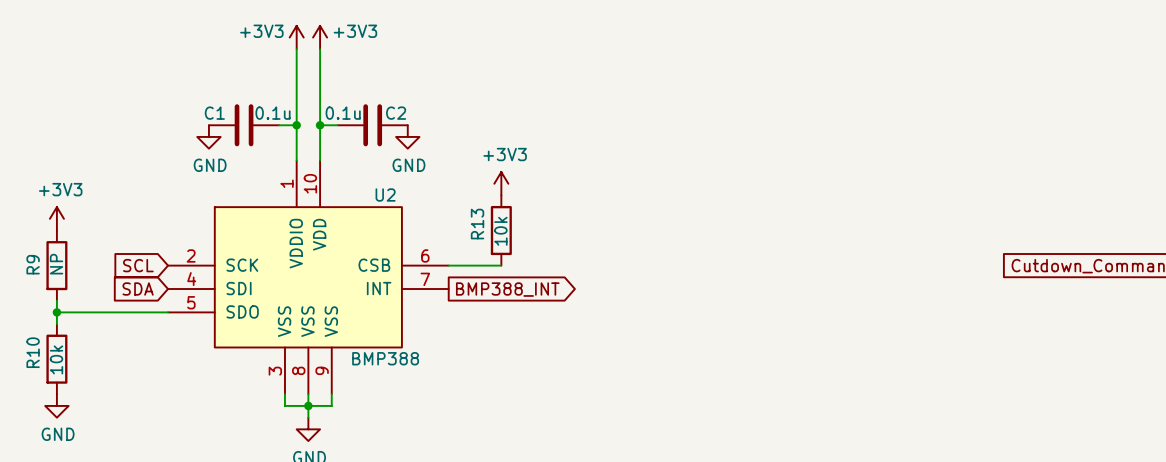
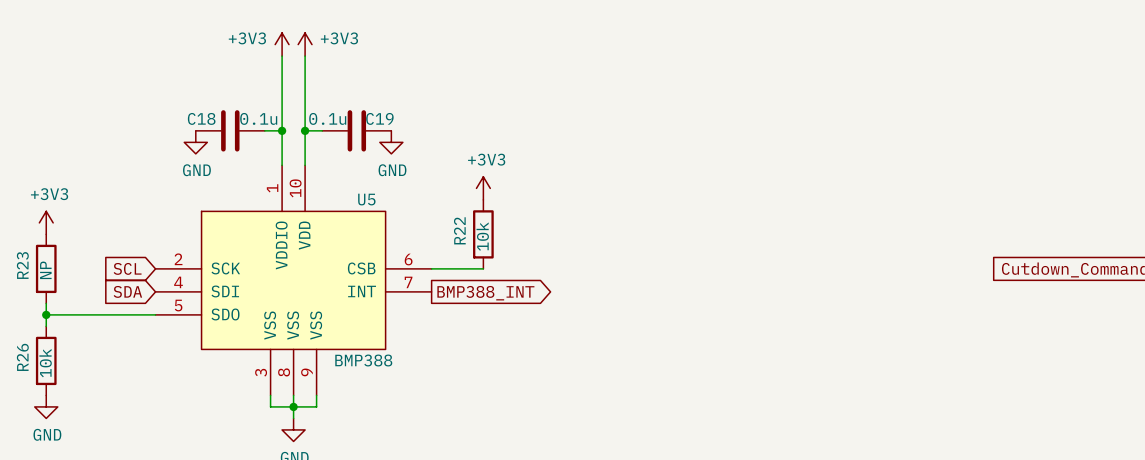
C1 name: C1 (214, 113) -> C18 (201, 118)
C2 name: C2 (396, 113) -> C19 (379, 118)
U2 name: U2 (385, 195) -> U5 (366, 199)
R13 name: R13 (477, 224) -> R22 (459, 230)
R9 name: R9 (33, 264) -> R23 (22, 265)
R10 name: R10 (33, 352) -> R26 (22, 357)

